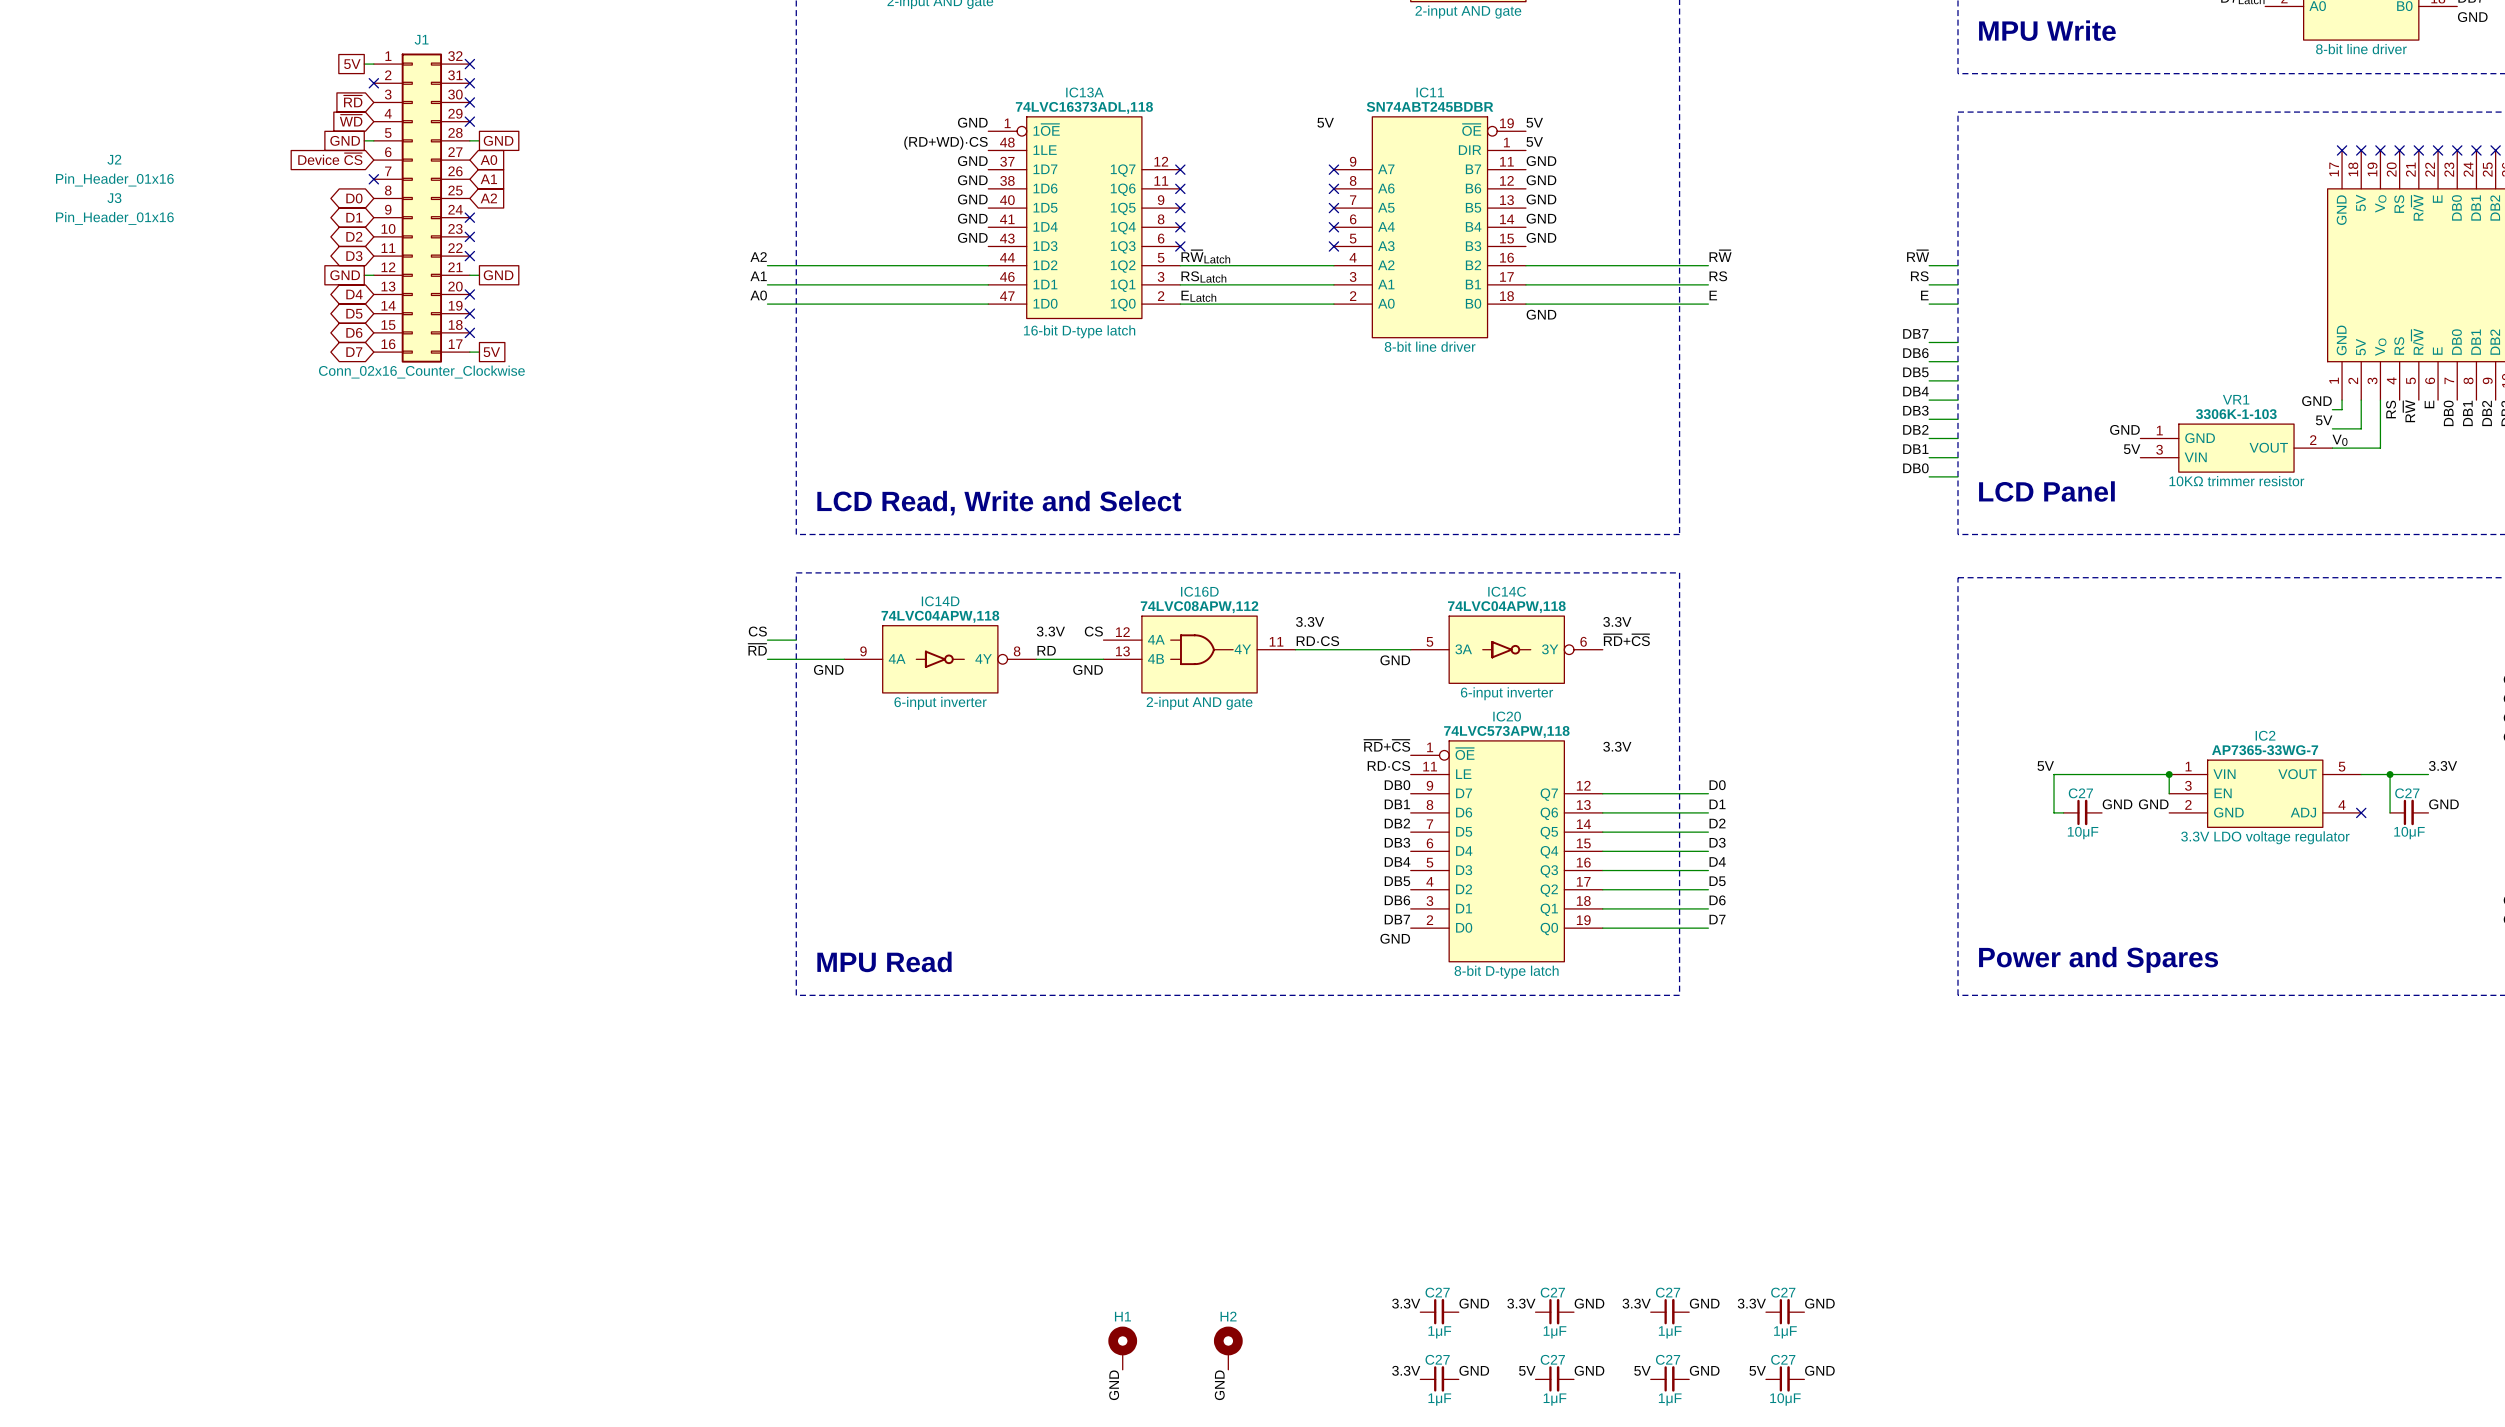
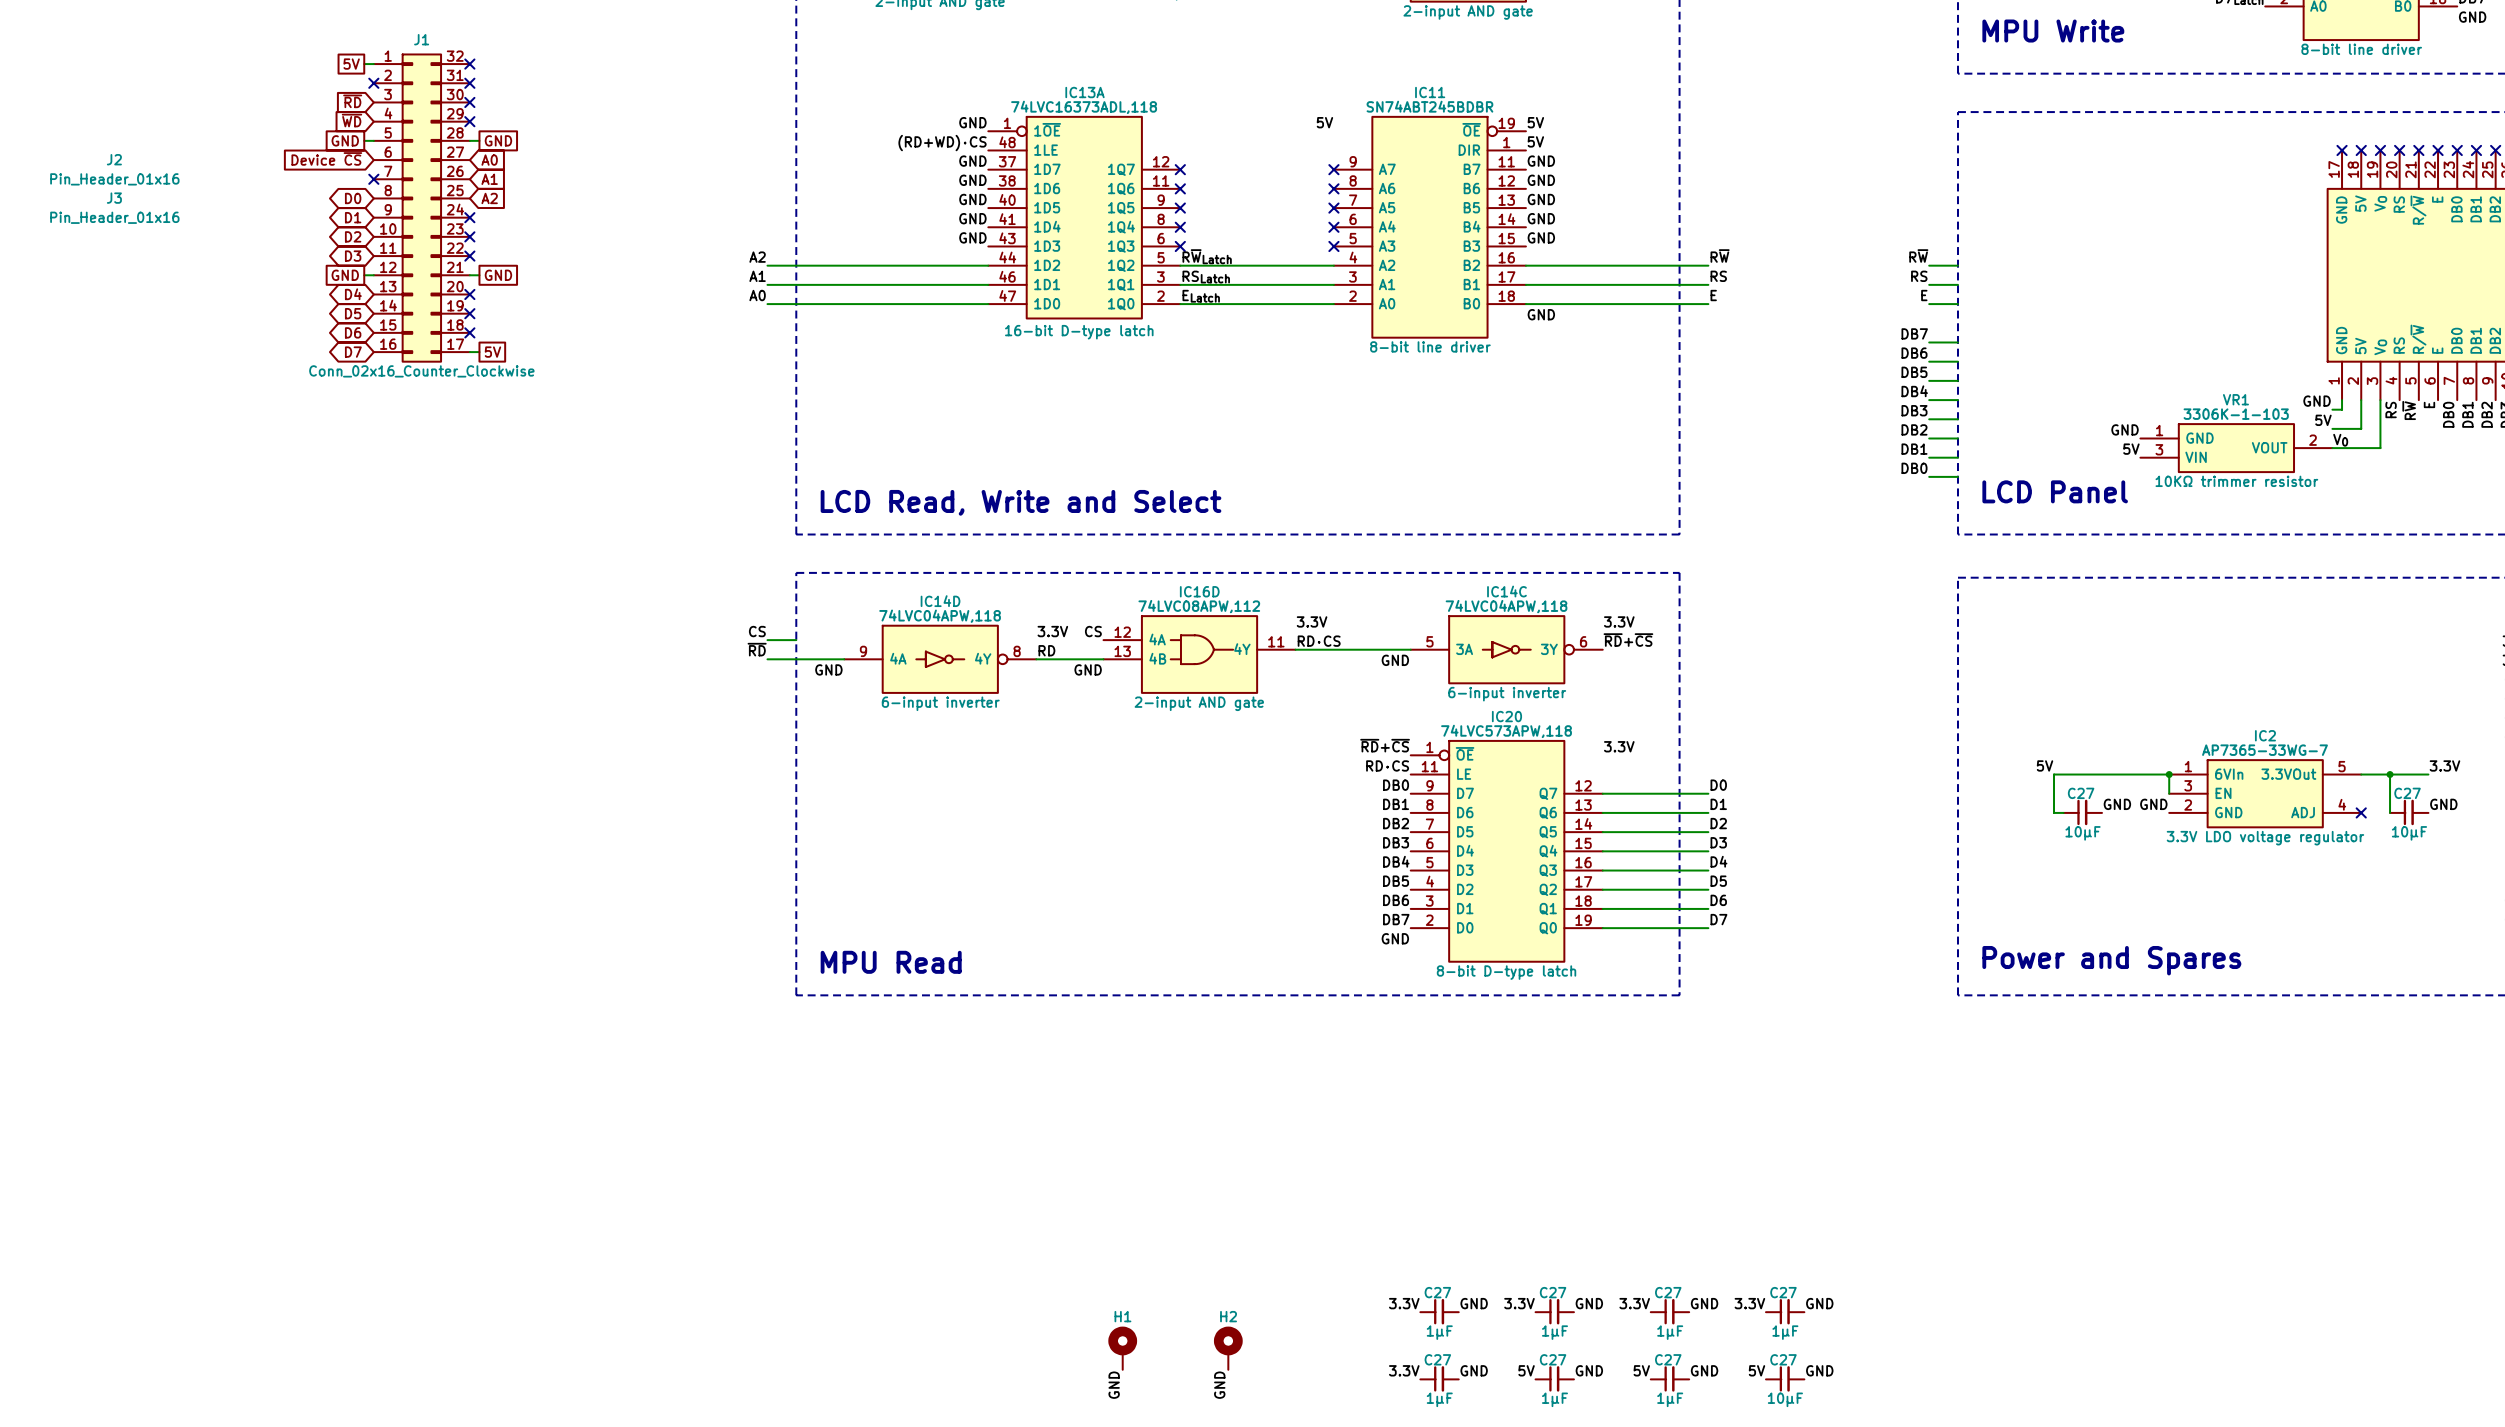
IC2 pin name: VIN (2224, 774) -> 6VIn (2229, 774)
IC2 pin name: VOUT (2297, 774) -> 3.3VOut (2288, 774)

